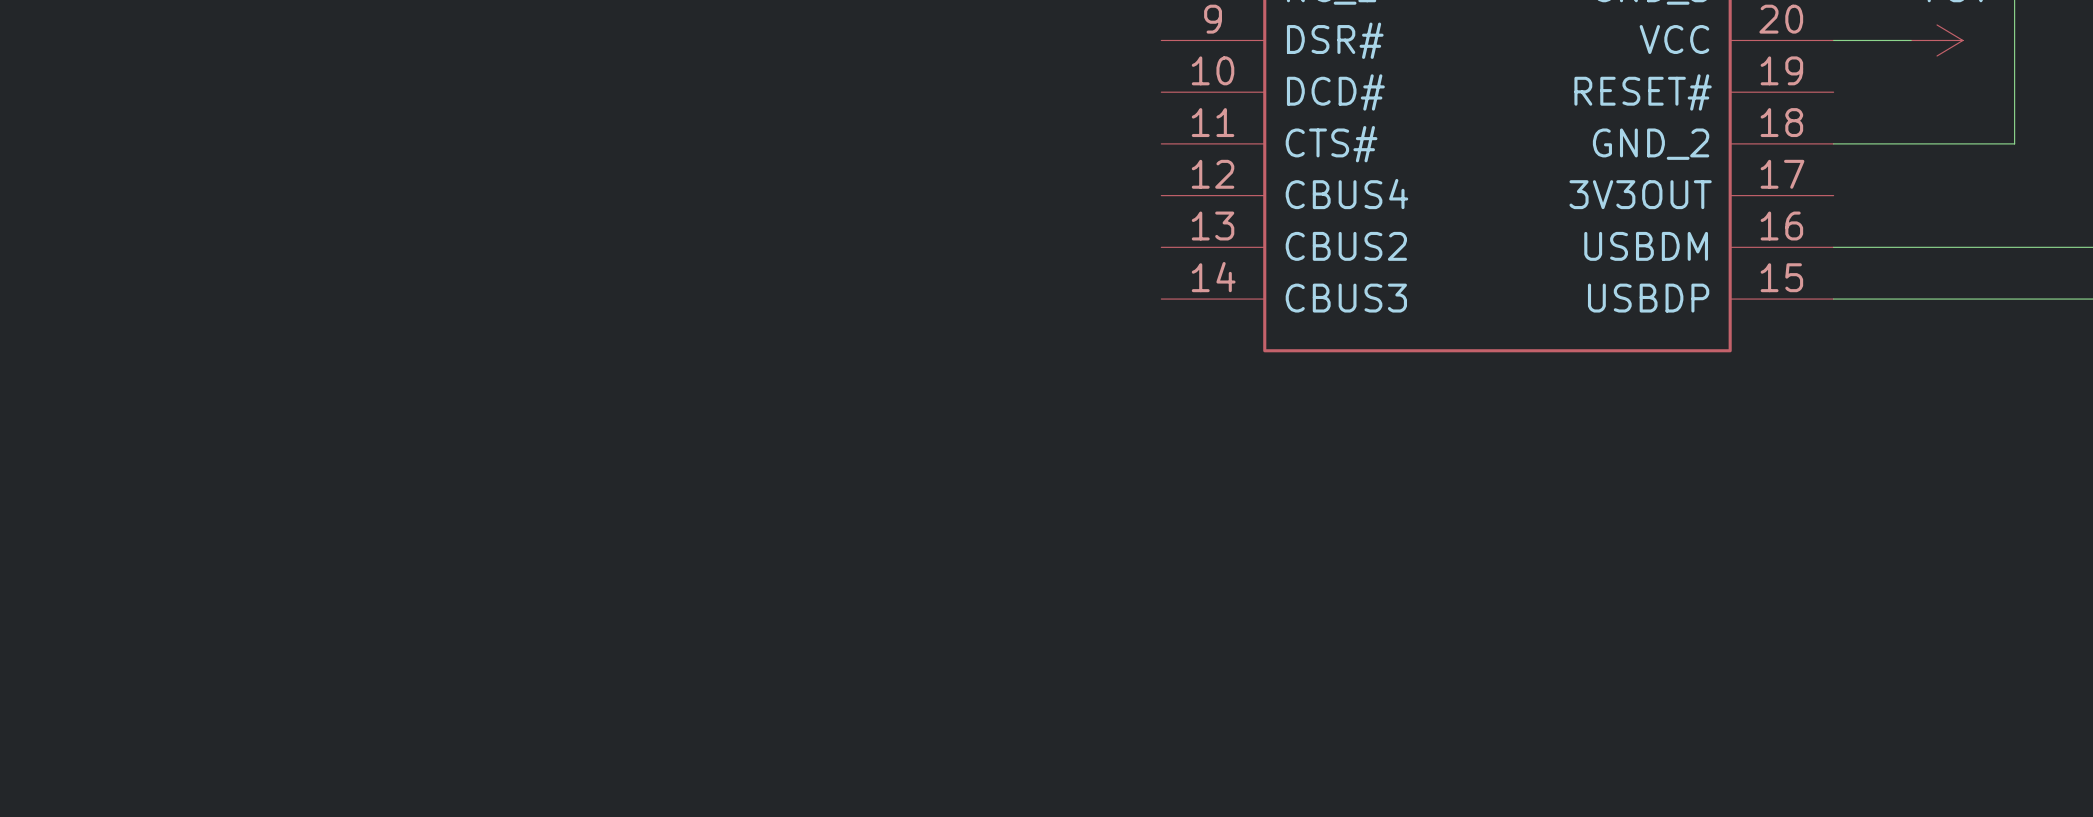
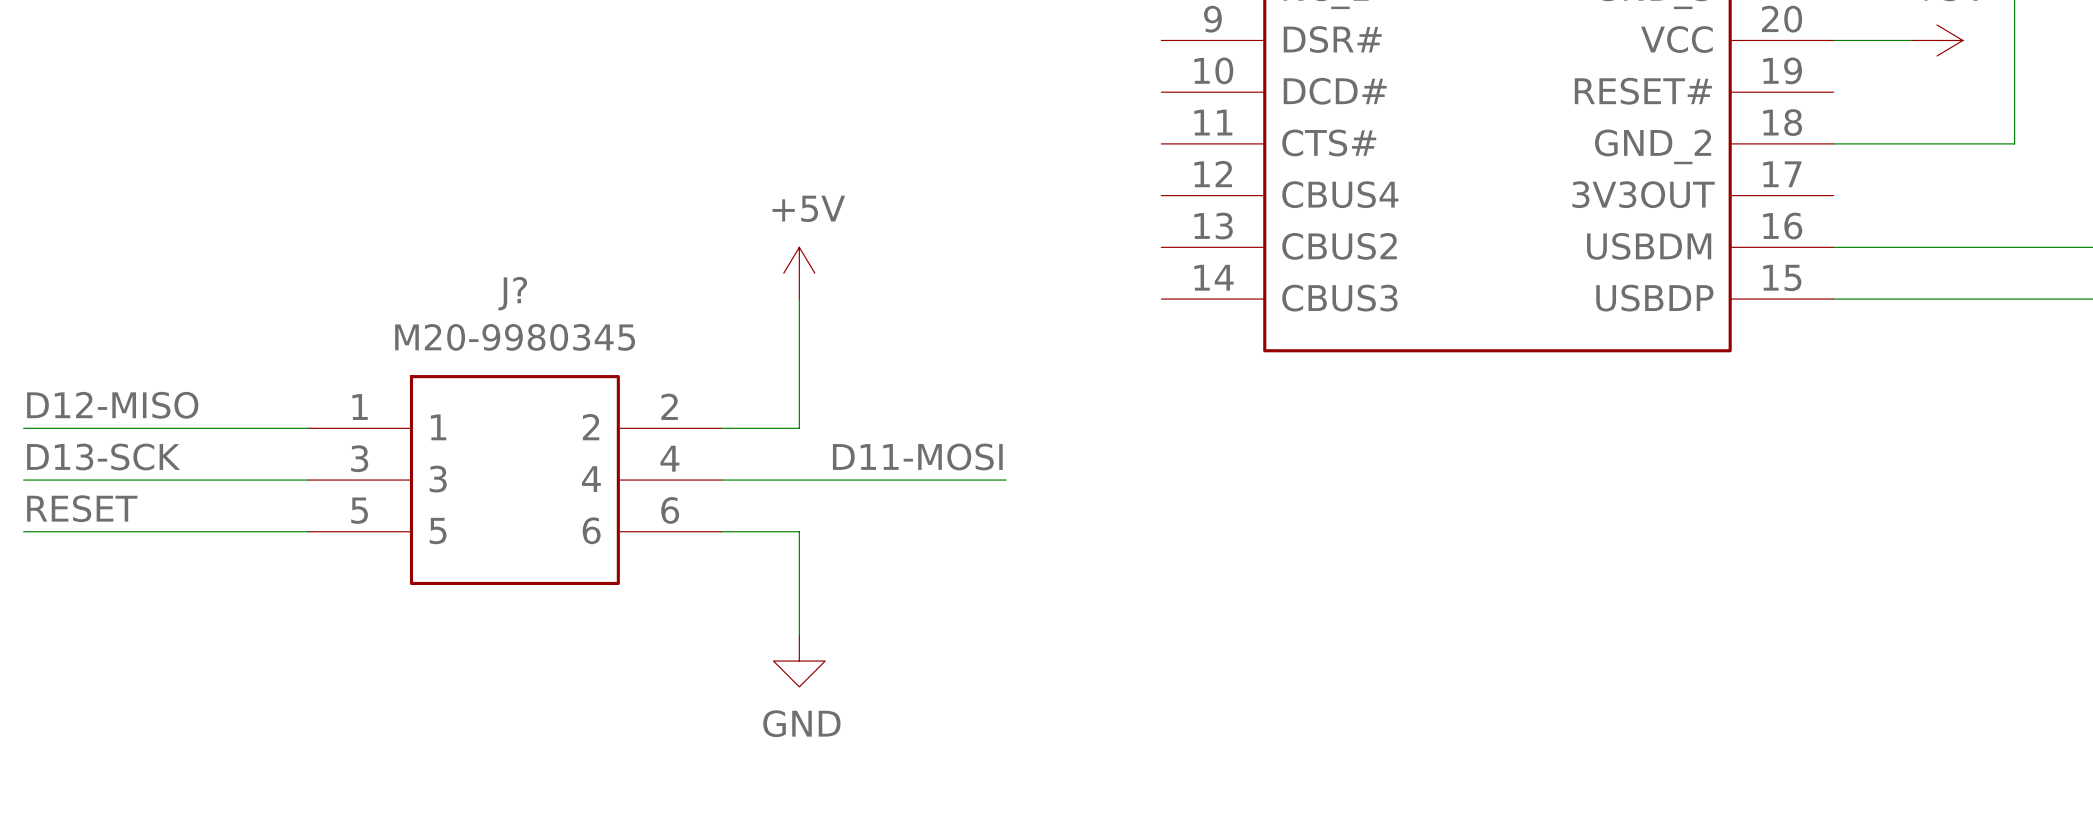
power symbol: none -> +5V (799, 273)
wire: none -> (799, 299) (799, 428) (721, 428)
label: none -> D12-MISO (112, 405)
wire: none -> (23, 428) (308, 428)
label: none -> D13-SCK (103, 456)
label: none -> D11-MOSI (917, 456)
wire: none -> (23, 480) (308, 480)
J?: none -> M20-9980345 (514, 480)
wire: none -> (721, 480) (1006, 480)
label: none -> RESET (82, 508)
wire: none -> (23, 531) (308, 531)
wire: none -> (721, 531) (799, 531) (799, 635)
power symbol: none -> GND (799, 661)

